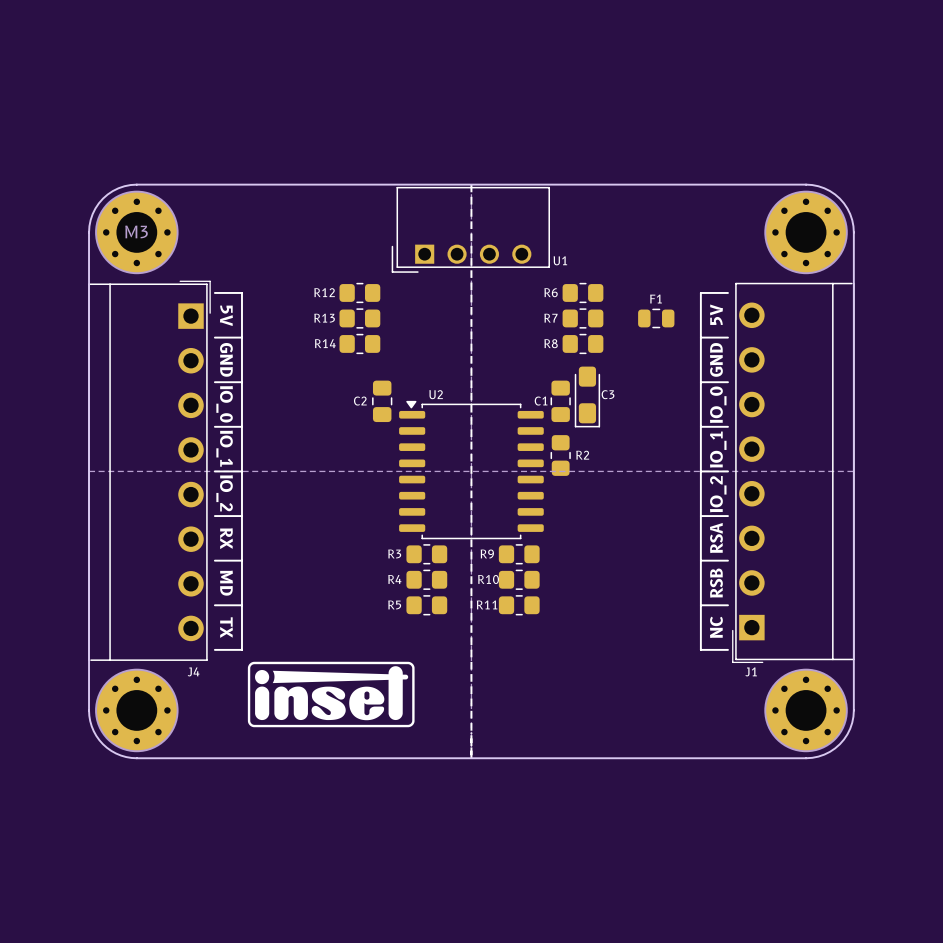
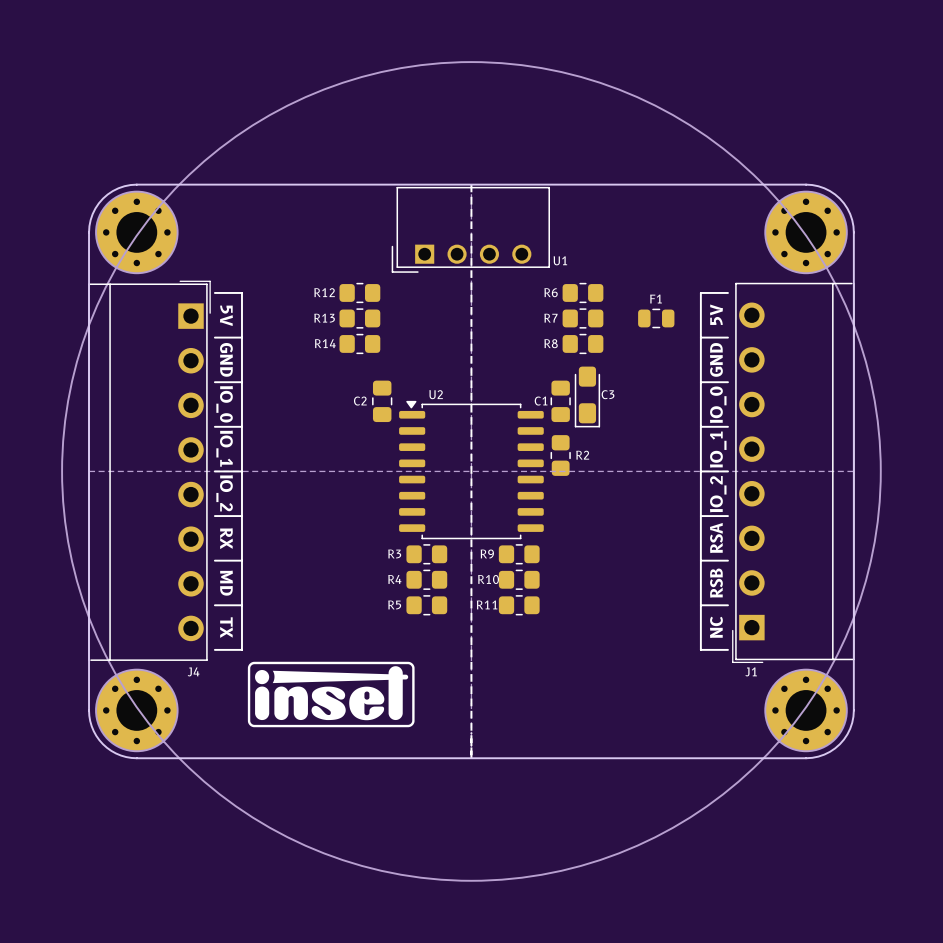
drawing: none -> [61, 61, 882, 882]
text: M3 (136, 231) -> none

